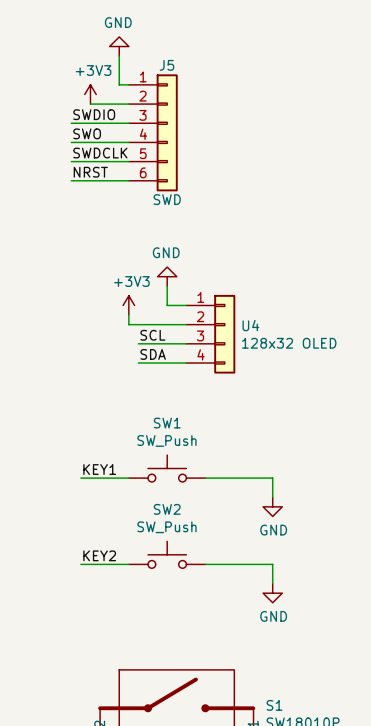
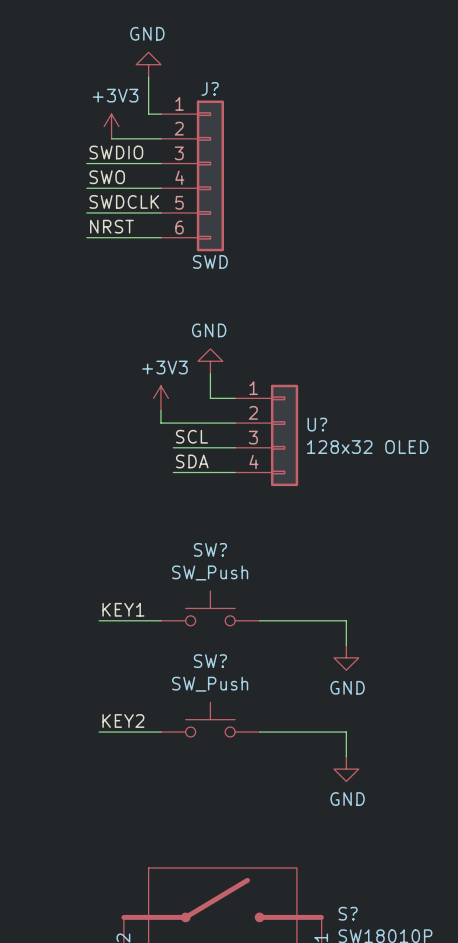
J5 name: J5 (166, 65) -> J? (210, 88)
U4 name: U4 (250, 325) -> U? (317, 424)
SW1 name: SW1 (167, 423) -> SW? (210, 549)
SW2 name: SW2 (167, 509) -> SW? (210, 661)
S1 name: S1 (274, 705) -> S? (348, 913)

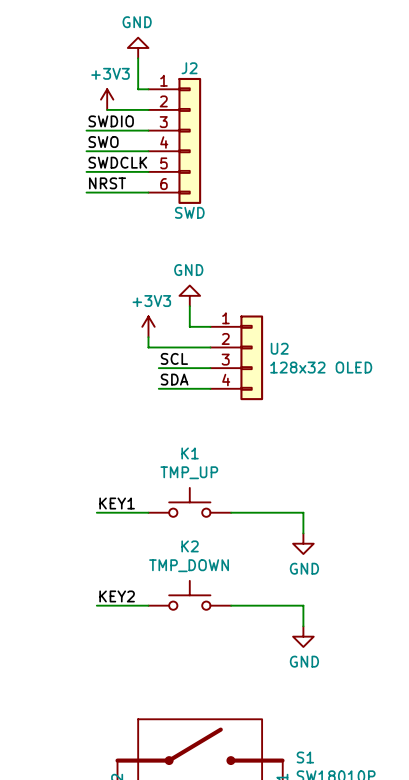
J? name: J? (210, 88) -> J2 (189, 68)
U? name: U? (317, 424) -> U2 (279, 348)
SW? name: SW? (210, 549) -> K1 (190, 453)
SW? value: SW_Push (210, 572) -> TMP_UP (189, 472)
SW? name: SW? (210, 661) -> K2 (190, 546)
SW? value: SW_Push (210, 684) -> TMP_DOWN (189, 565)
S? name: S? (348, 913) -> S1 (305, 757)

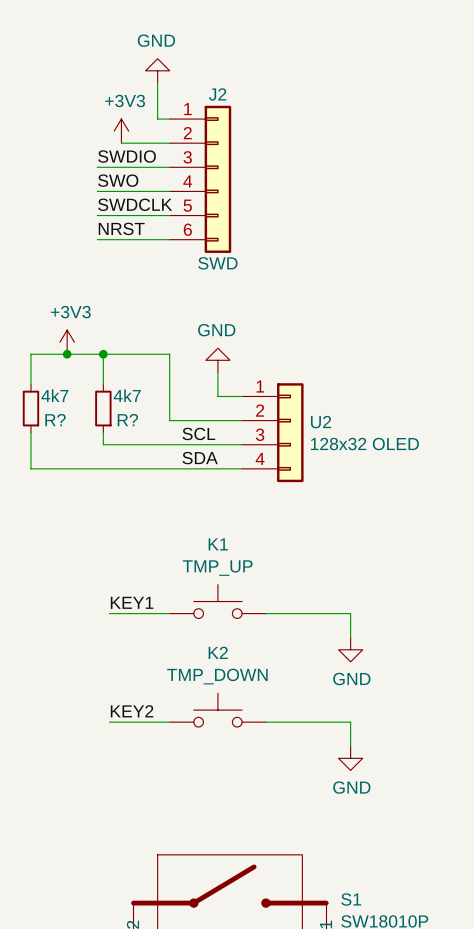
junction: none -> (67, 354)
wire: none -> (103, 354) (103, 384)
junction: none -> (103, 354)
wire: none -> (30, 384) (30, 354) (169, 354) (169, 408)
power symbol position: +3V3 (148, 326) -> +3V3 (67, 342)
R?: none -> 4k7 (30, 408)
R?: none -> 4k7 (103, 408)
wire: none -> (30, 432) (30, 468) (181, 468)
wire: none -> (103, 432) (103, 444) (181, 444)

